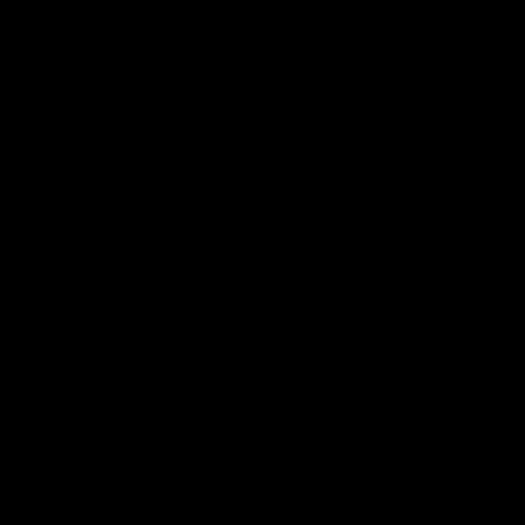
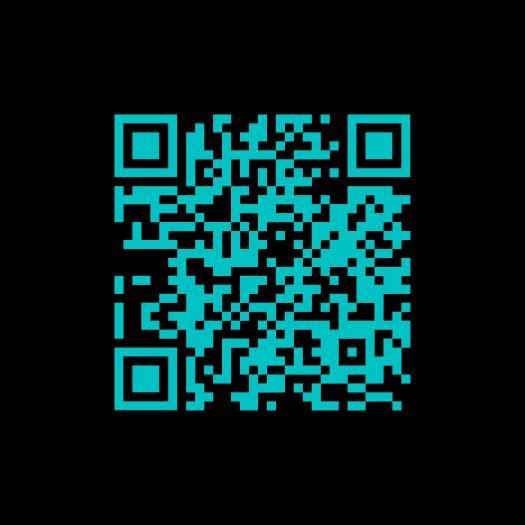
drawing: none -> [114, 114, 411, 411]

